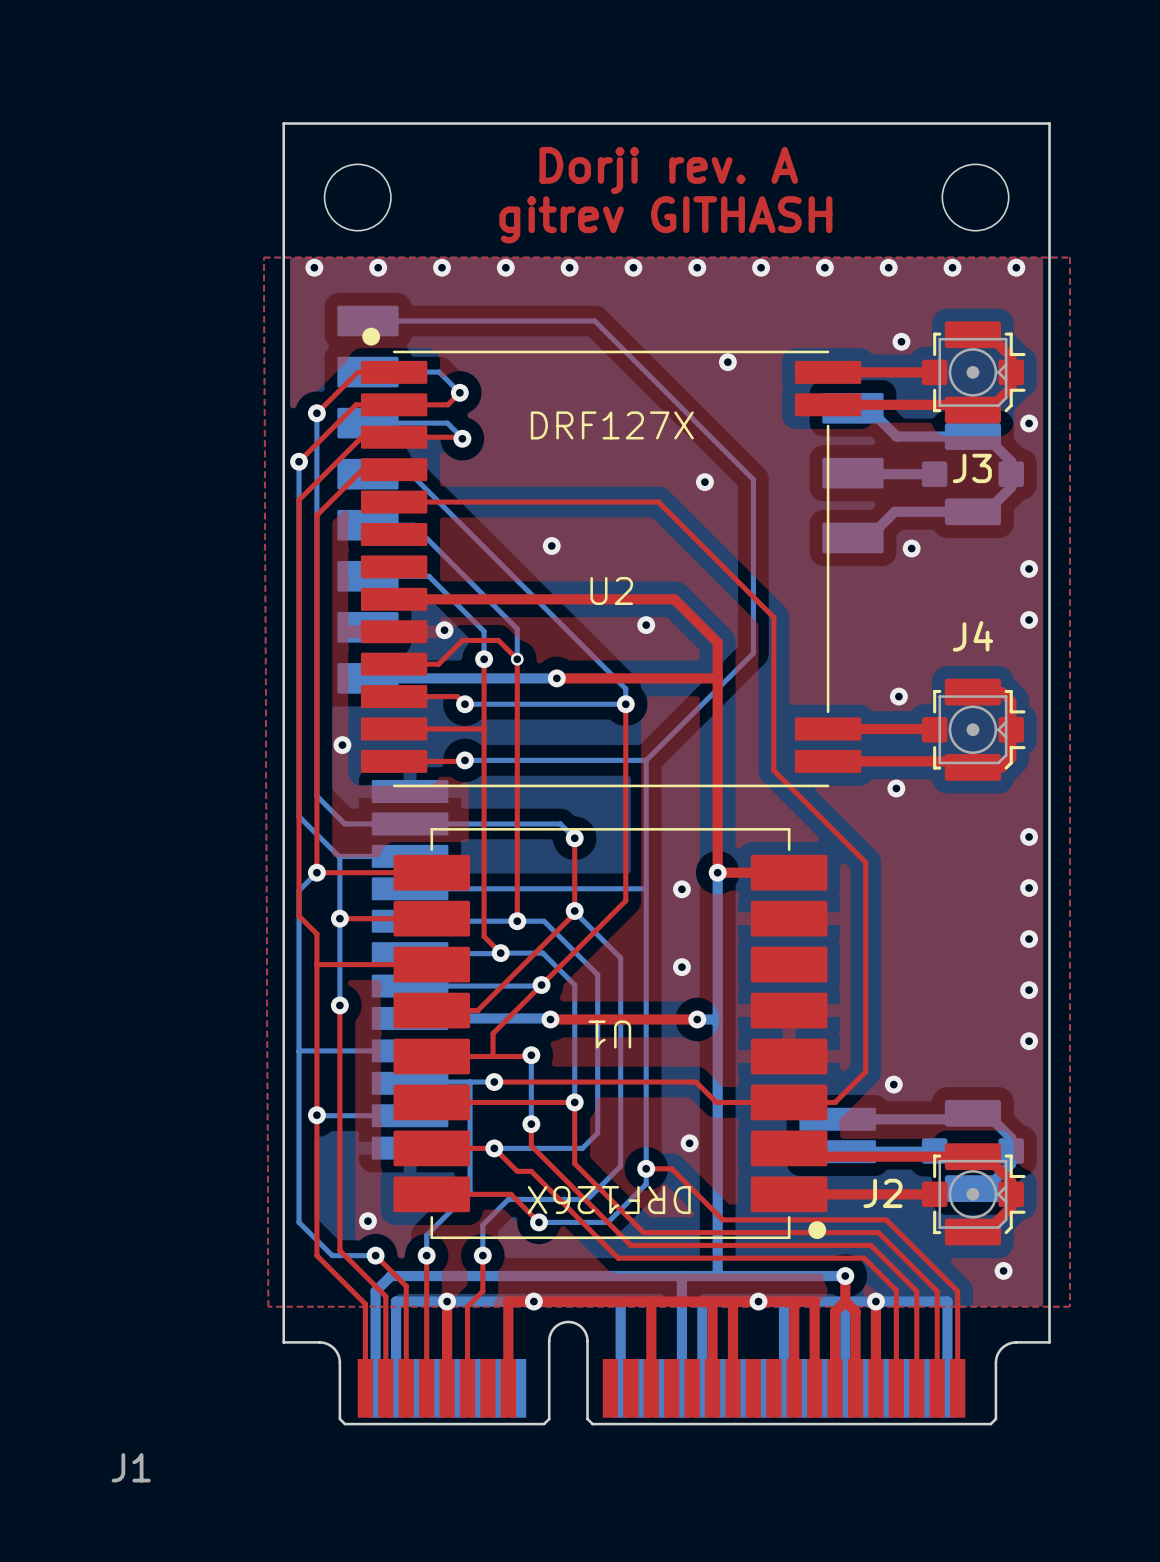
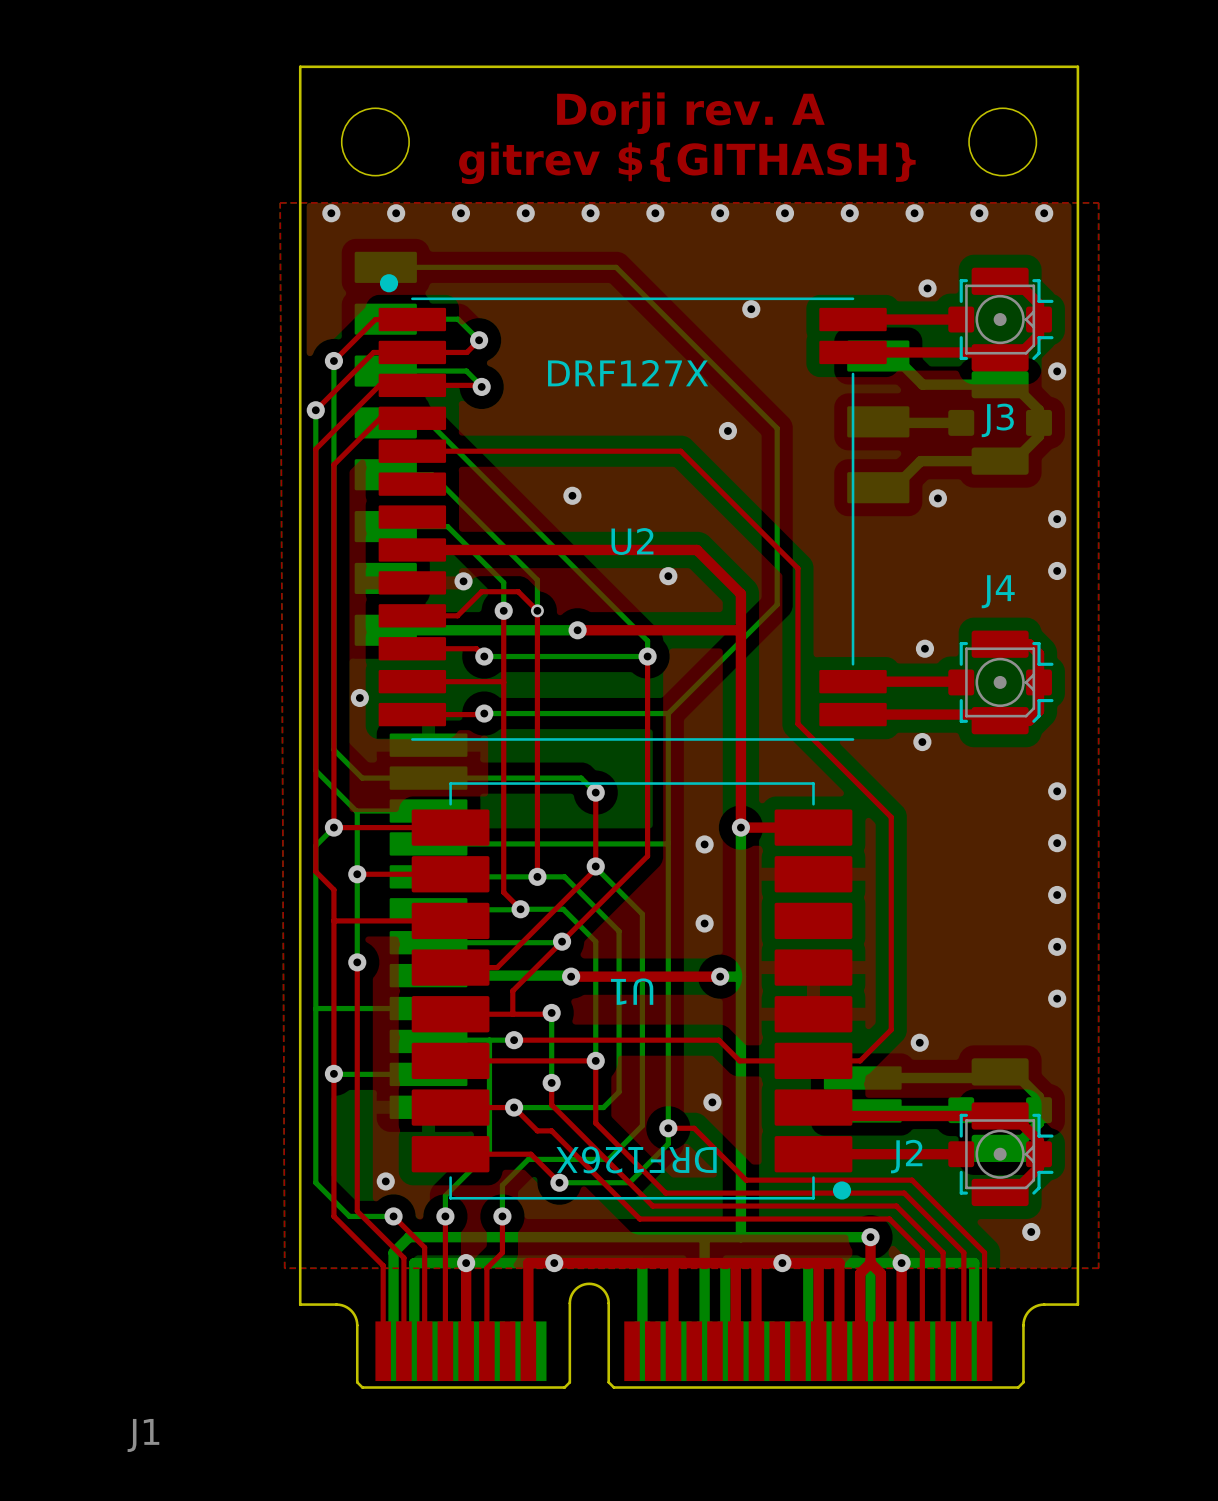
text: gitrev GITHASH (665, 219) -> gitrev ${GITHASH} (687, 163)

